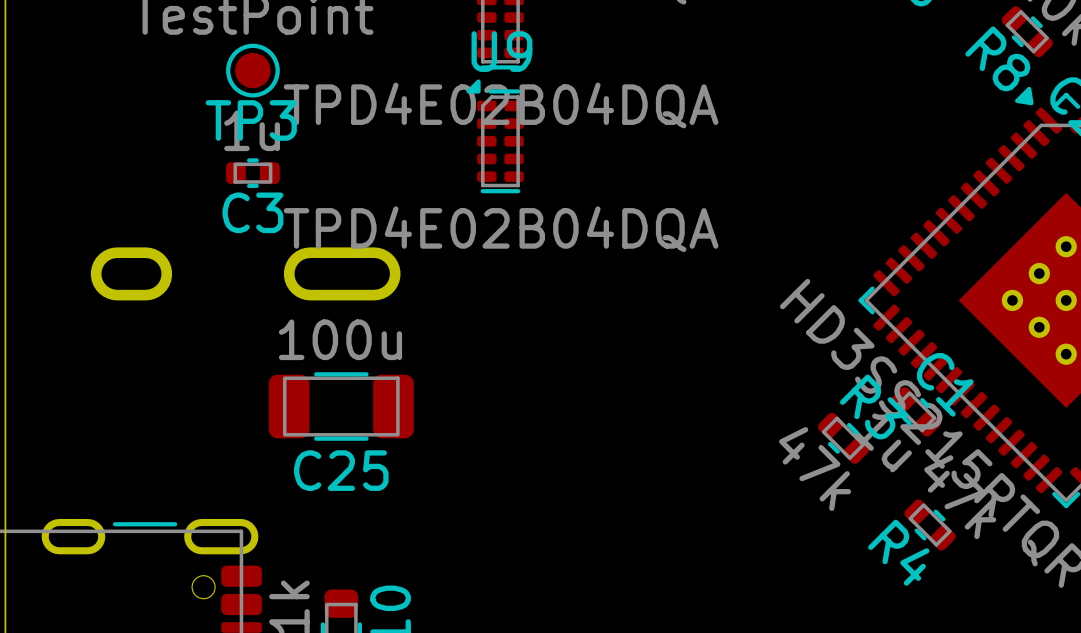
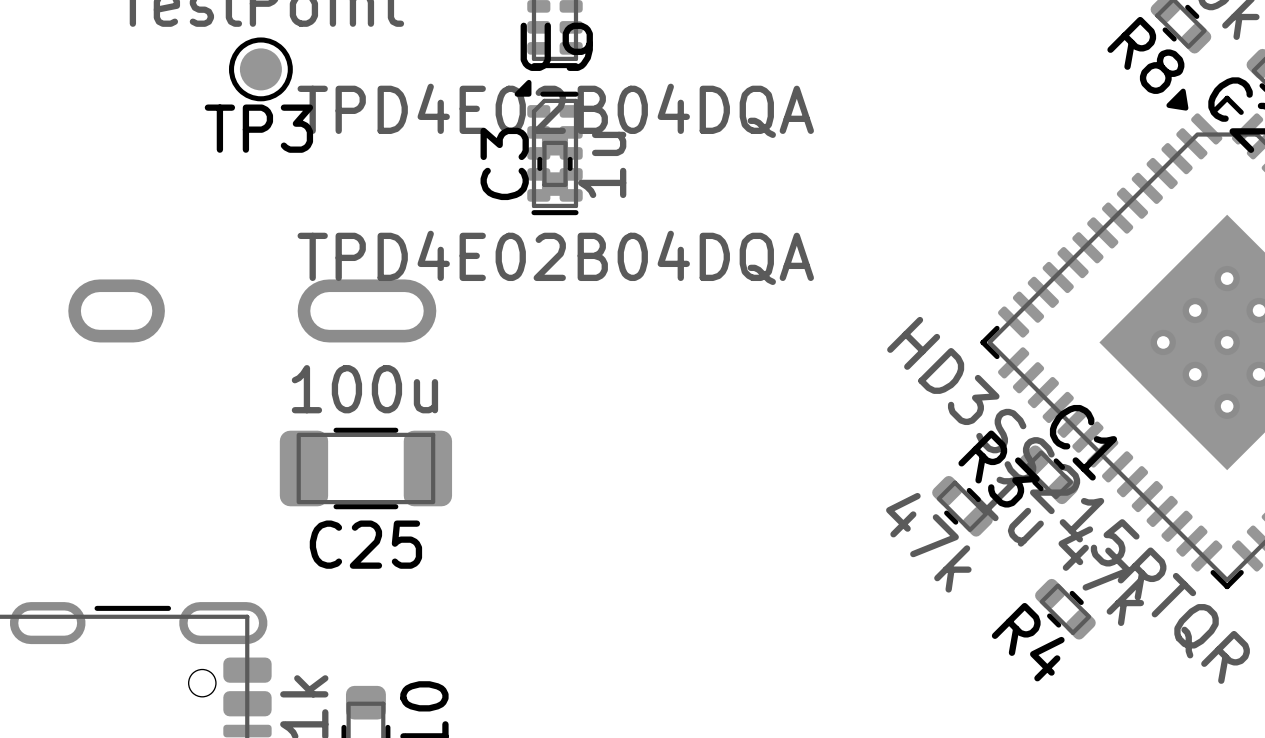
C3 rotation: 0° (252, 173) -> 90° clockwise (554, 163)
C3 position: (252, 173) -> (554, 163)

